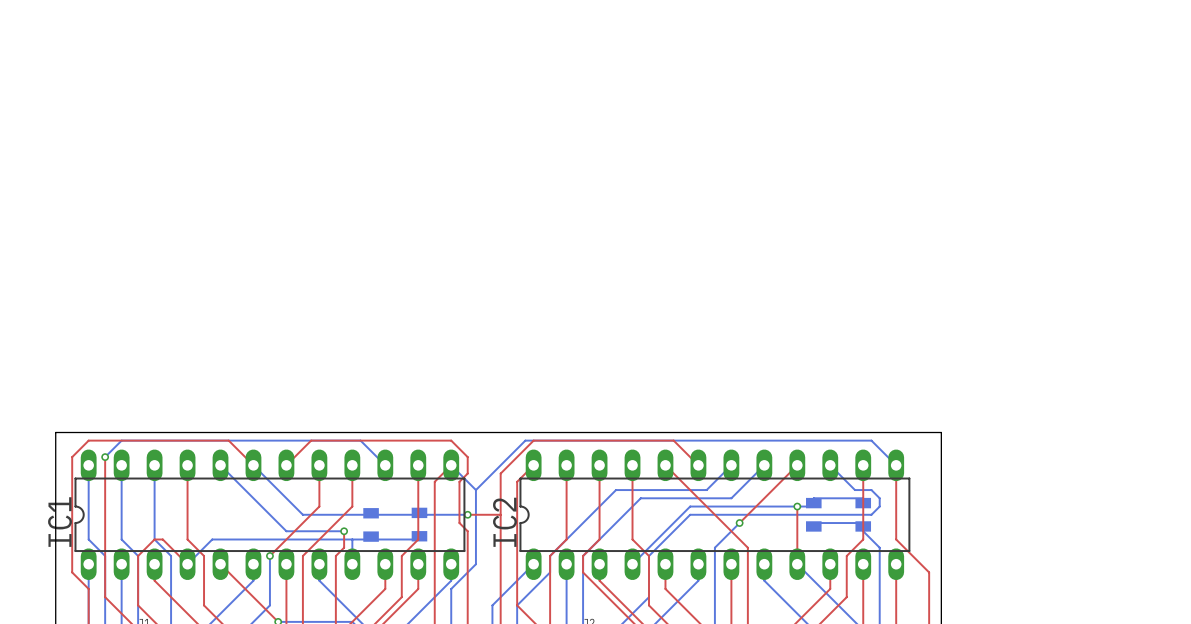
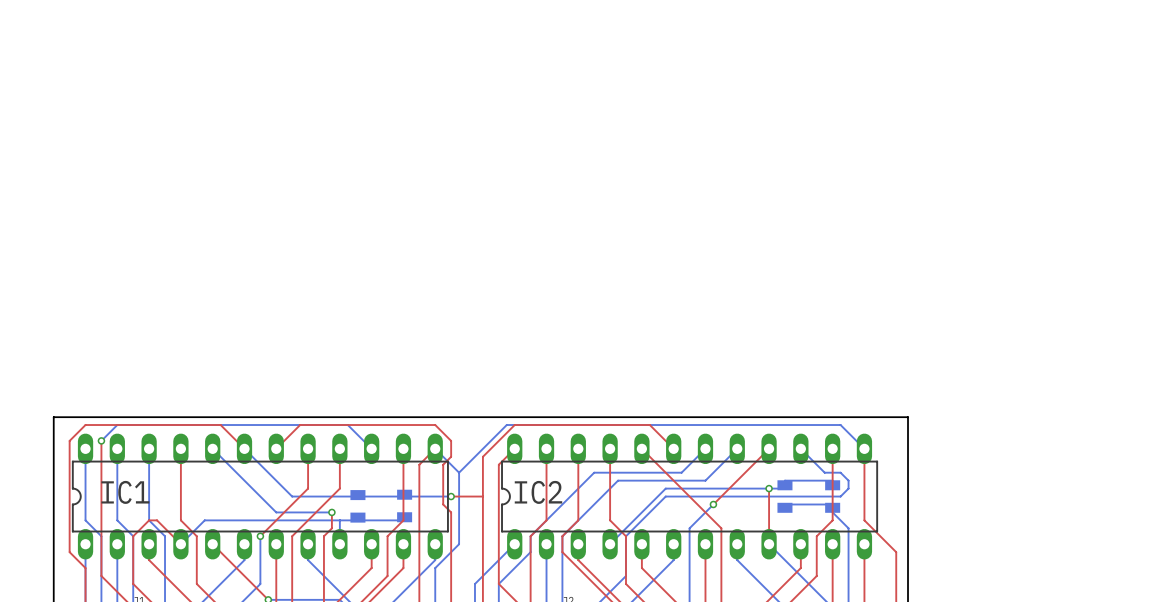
IC1 name rotation: 0° (60, 522) -> 90° clockwise (125, 492)
IC2 name rotation: 0° (504, 522) -> 90° clockwise (538, 492)

